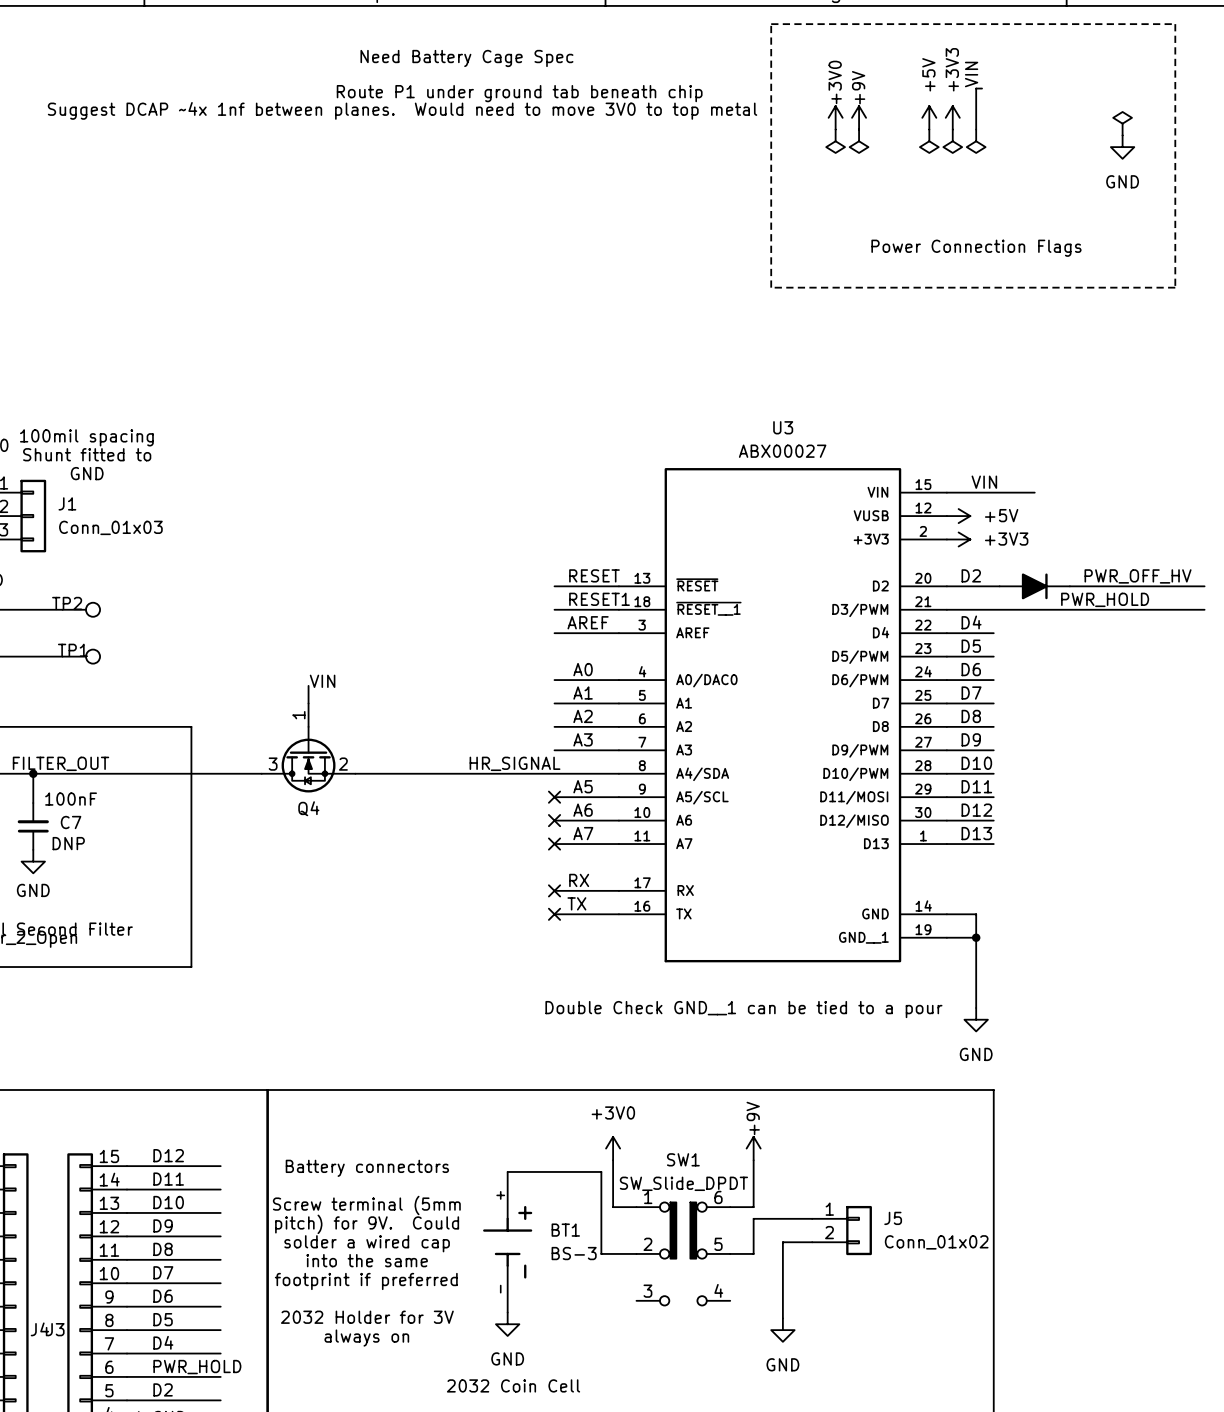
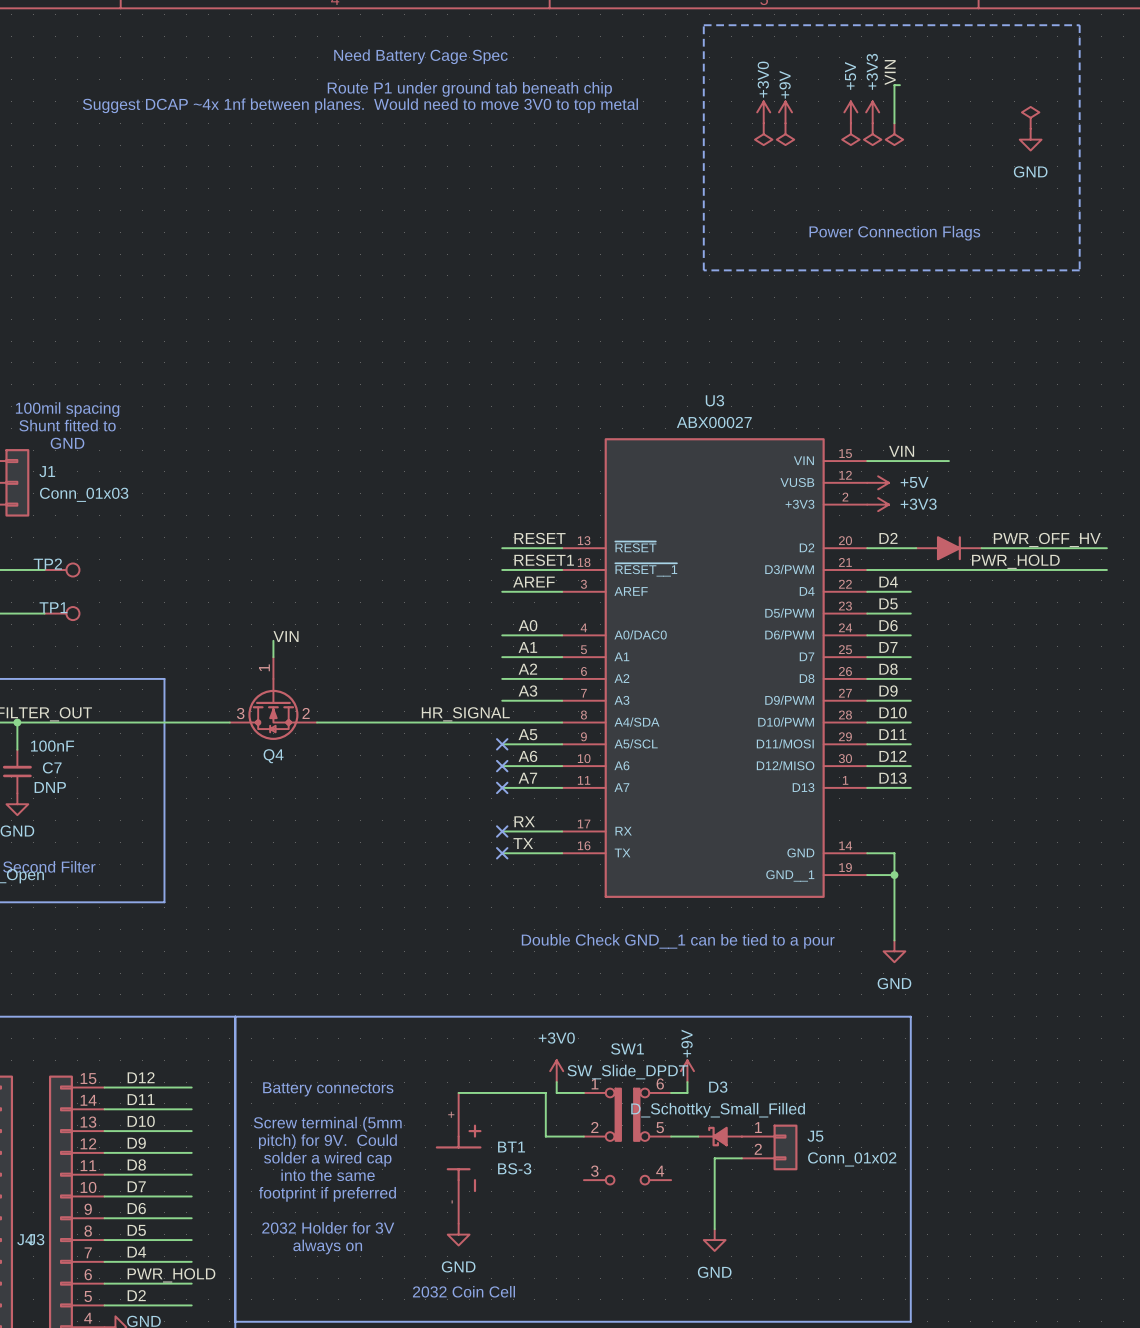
wire: (613, 1171) (613, 1207) (636, 1207) -> (556, 1092) (583, 1092)
wire: (753, 1171) (753, 1207) (730, 1207) -> (687, 1092) (671, 1092)
wire: (601, 1218) (601, 1253) (636, 1253) -> (545, 1136) (583, 1136)
wire: (753, 1218) (753, 1253) (730, 1253) -> (687, 1136) (671, 1136)
D3: none -> D_Schottky_Small_Filled (720, 1136)
SW1 position: (683, 1253) -> (627, 1136)

